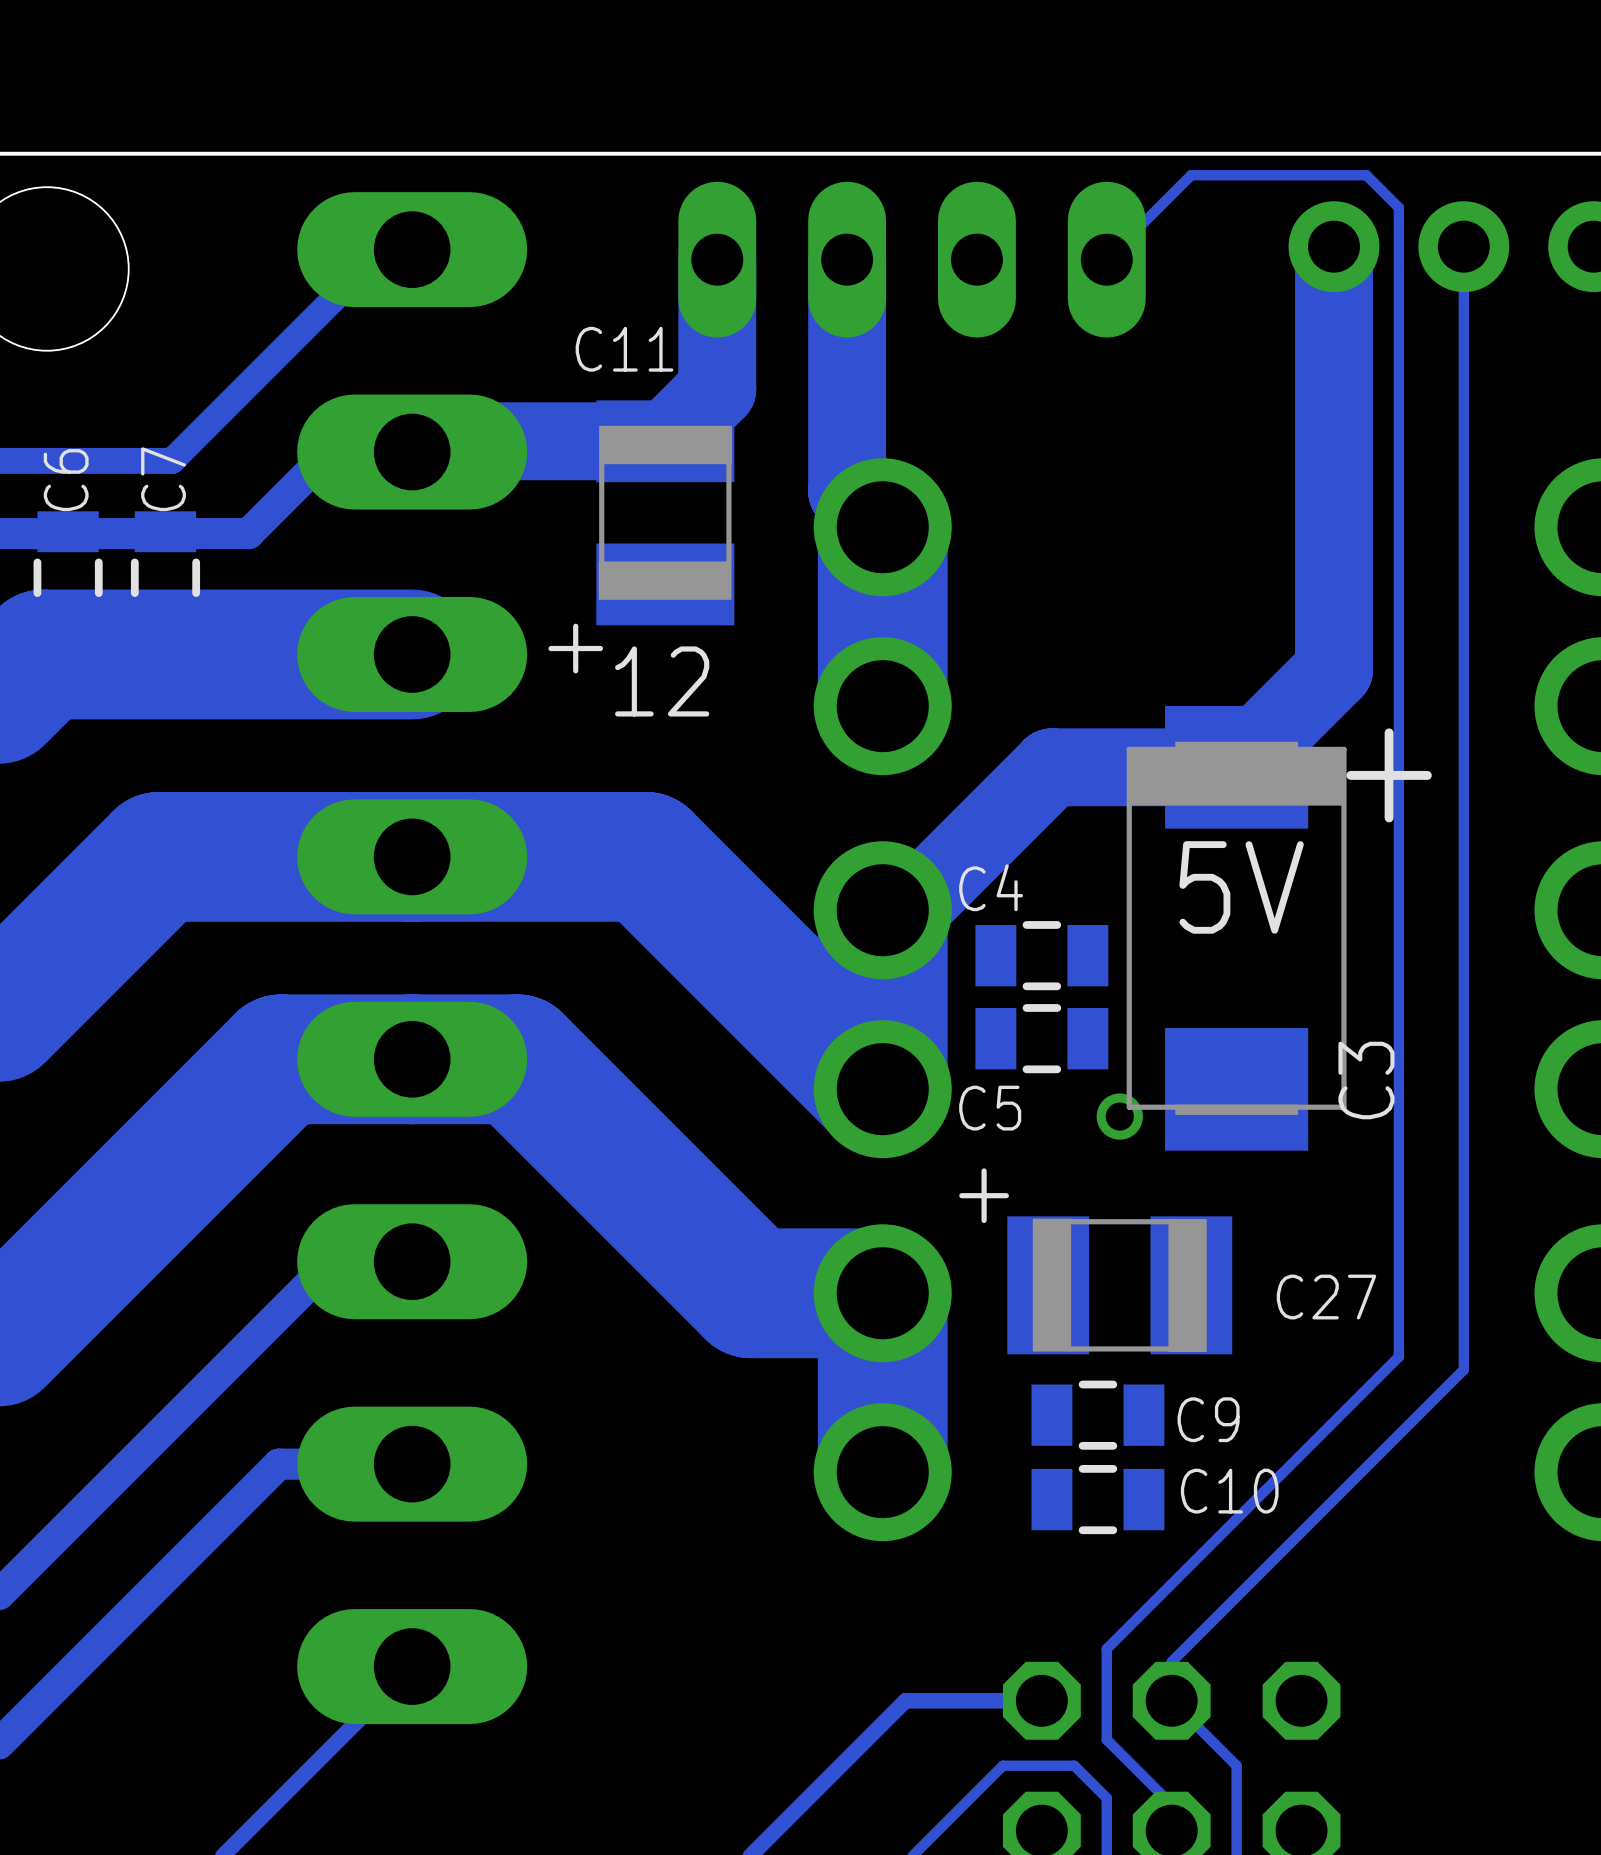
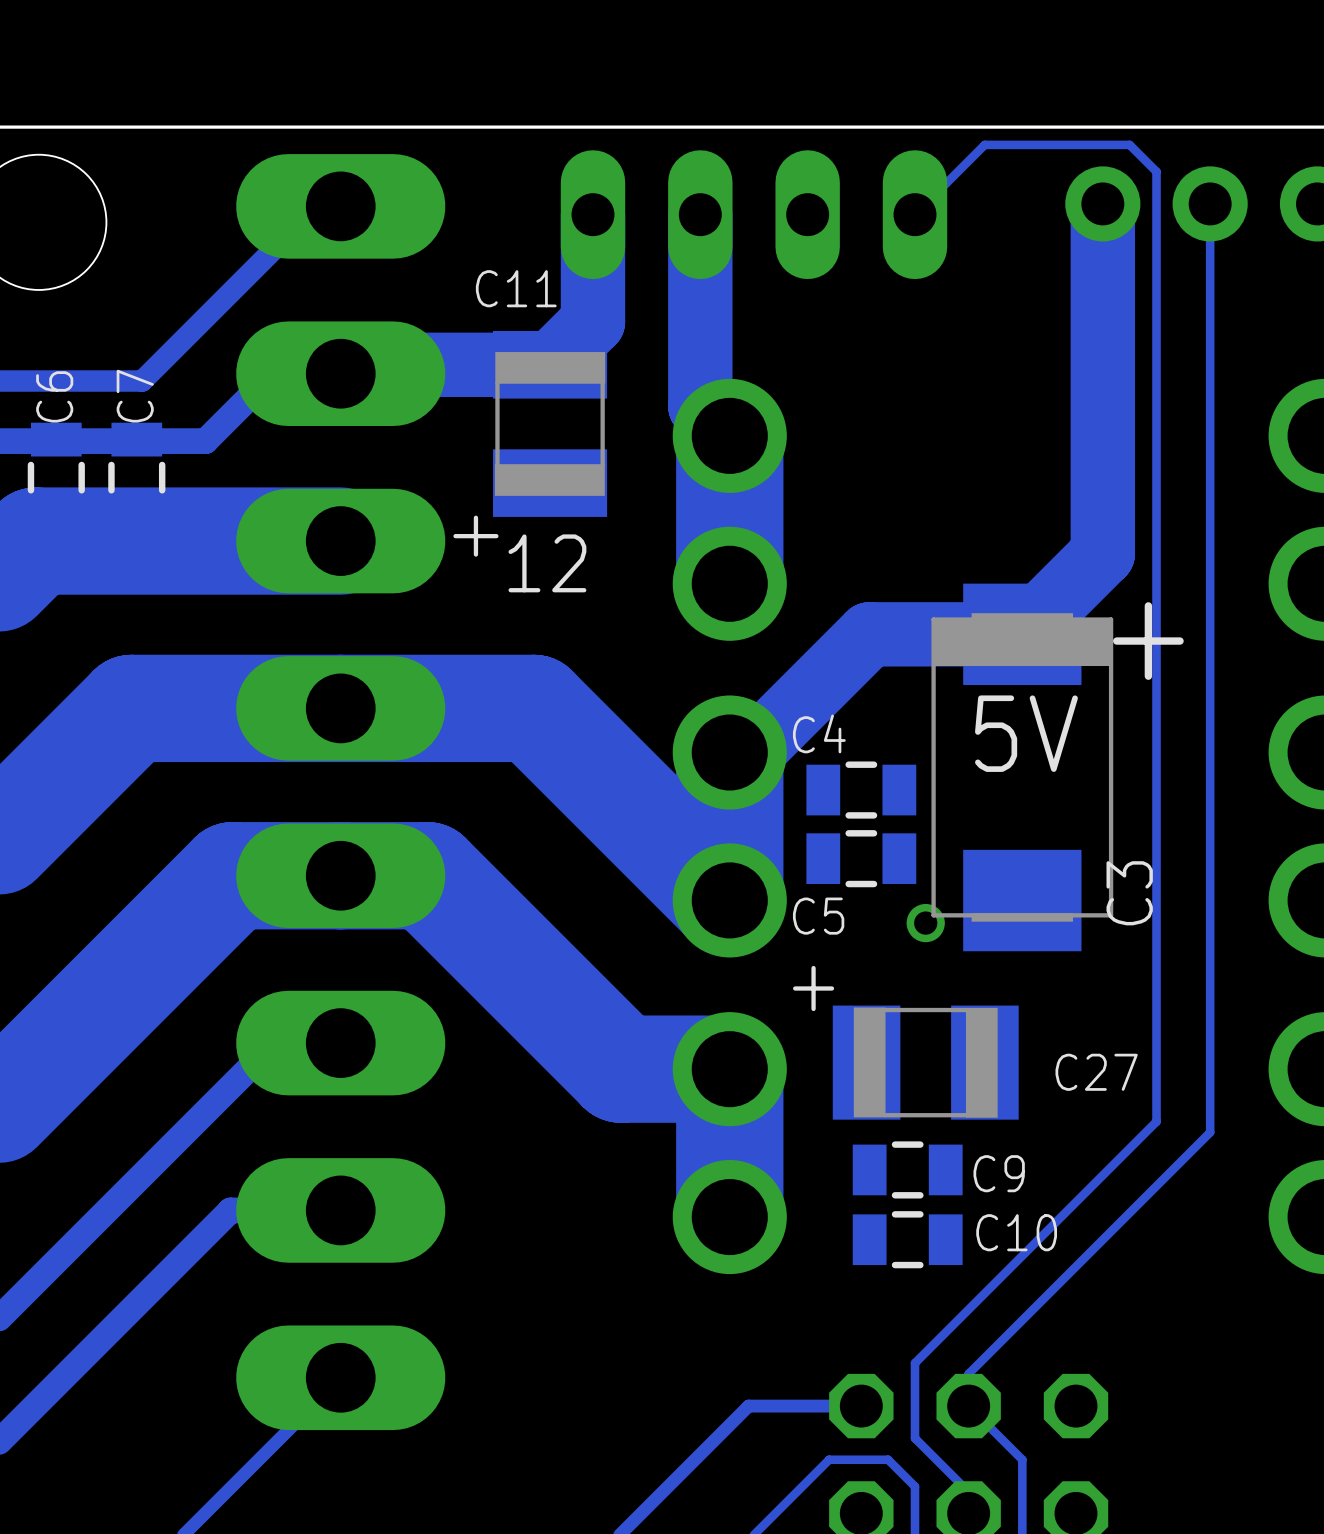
part footprint: [297, 192, 528, 1725] -> [236, 154, 446, 1431]

